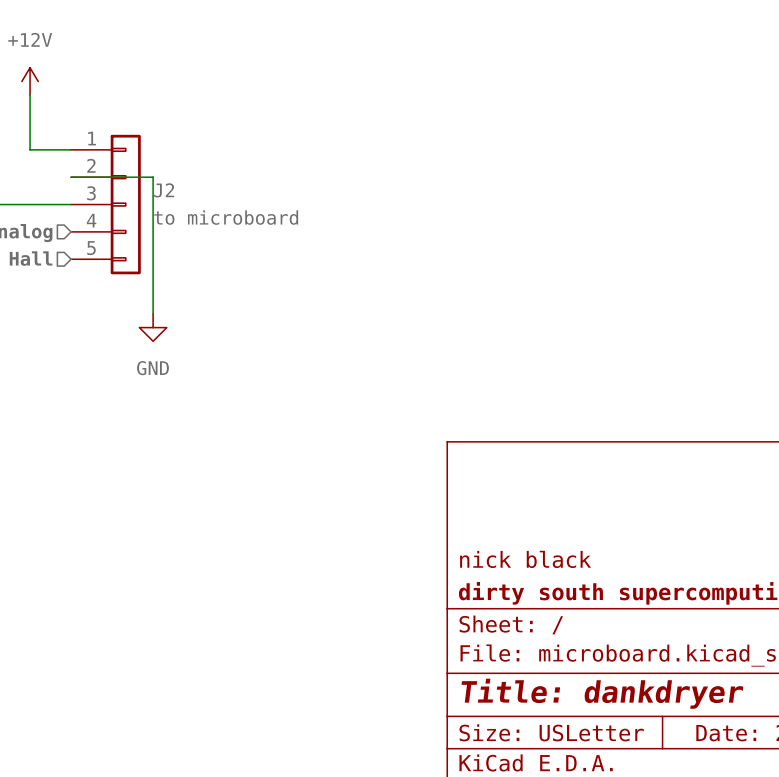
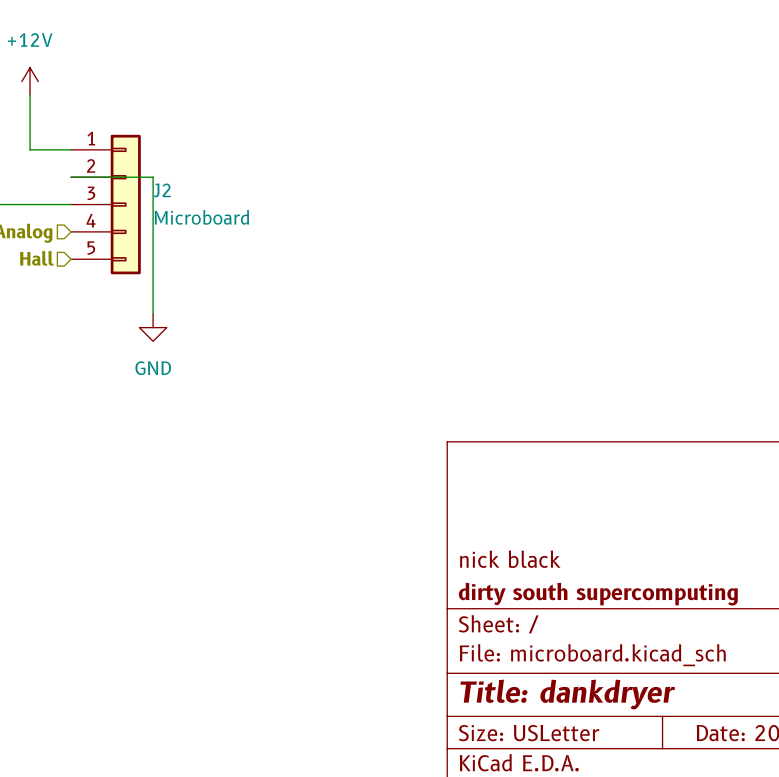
J2 value: to microboard (226, 217) -> Microboard (201, 217)

